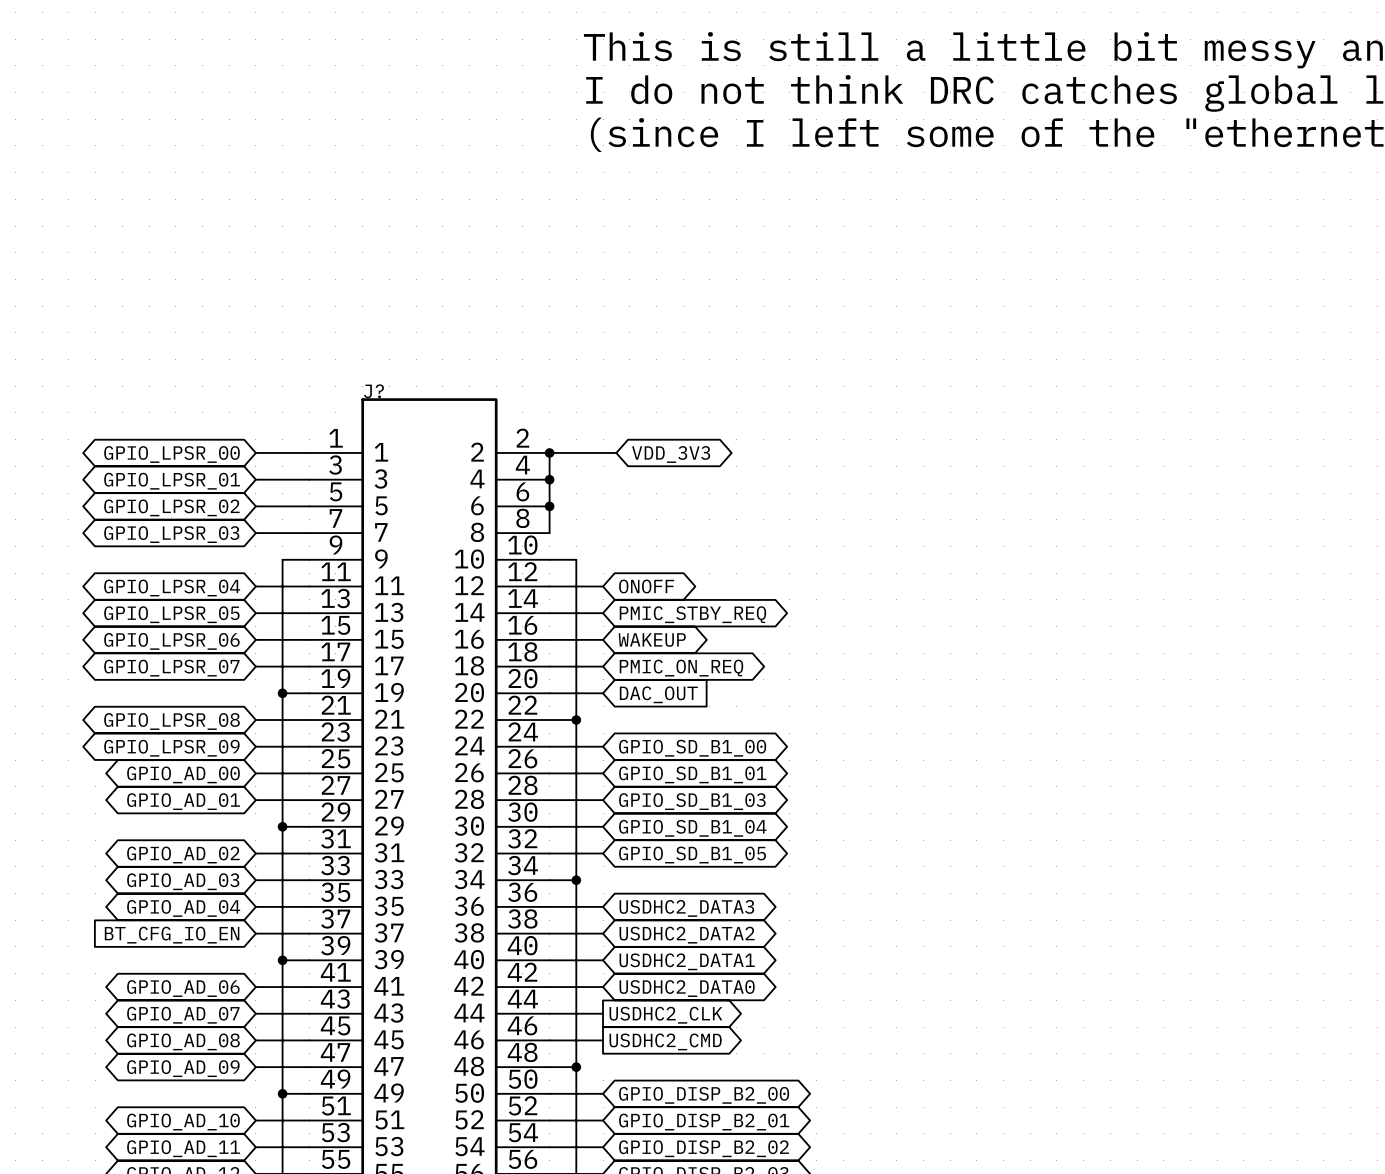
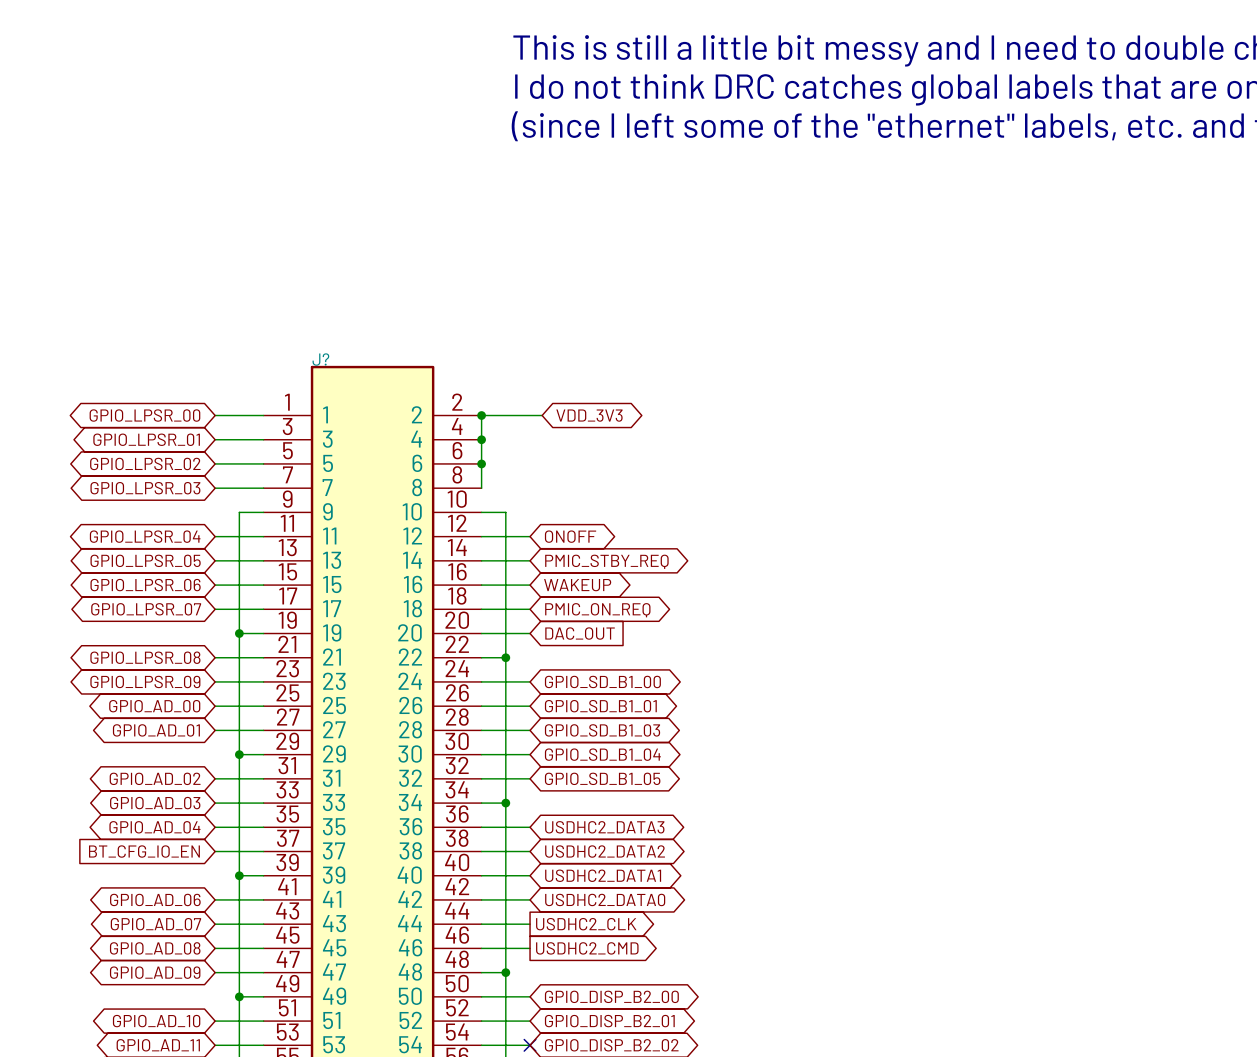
no-connect mark: none -> (530, 1045)

